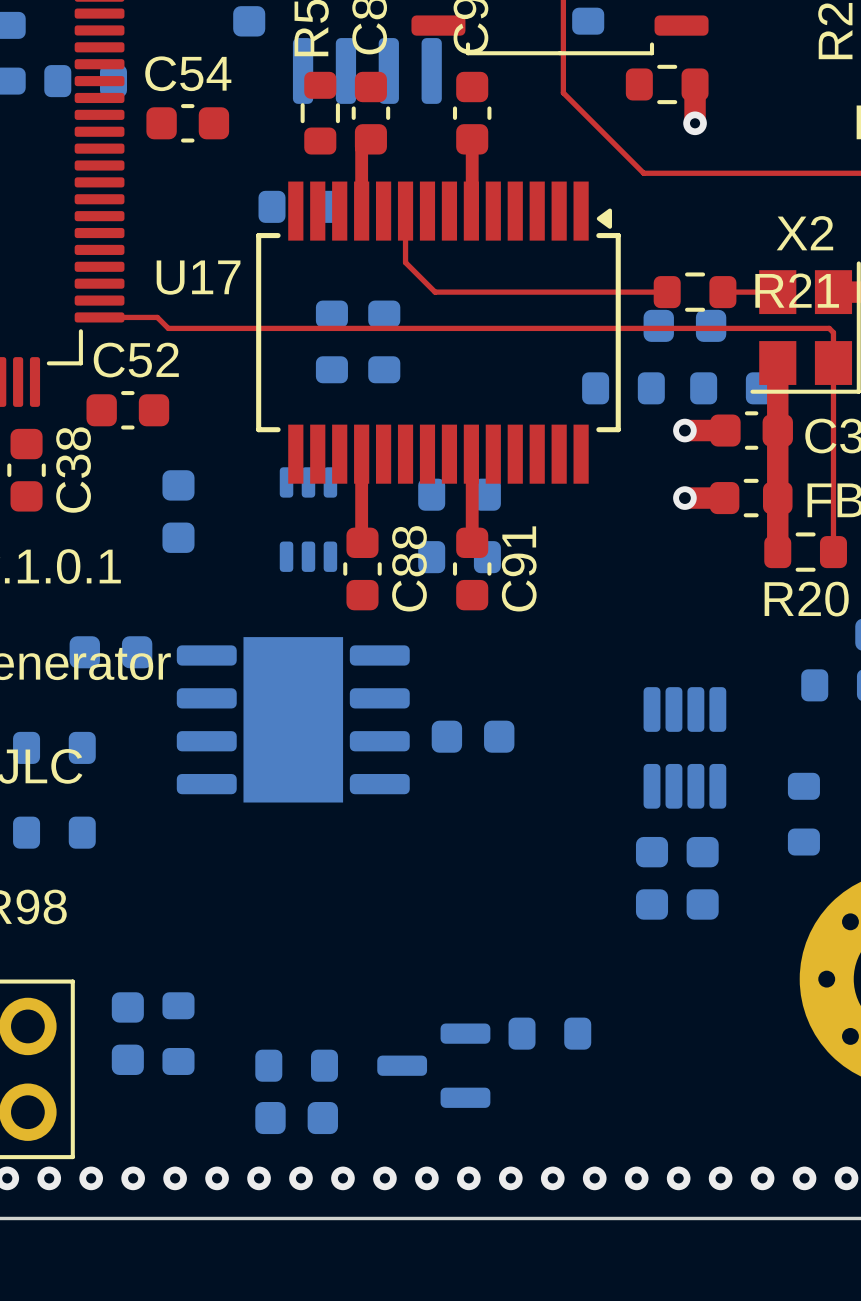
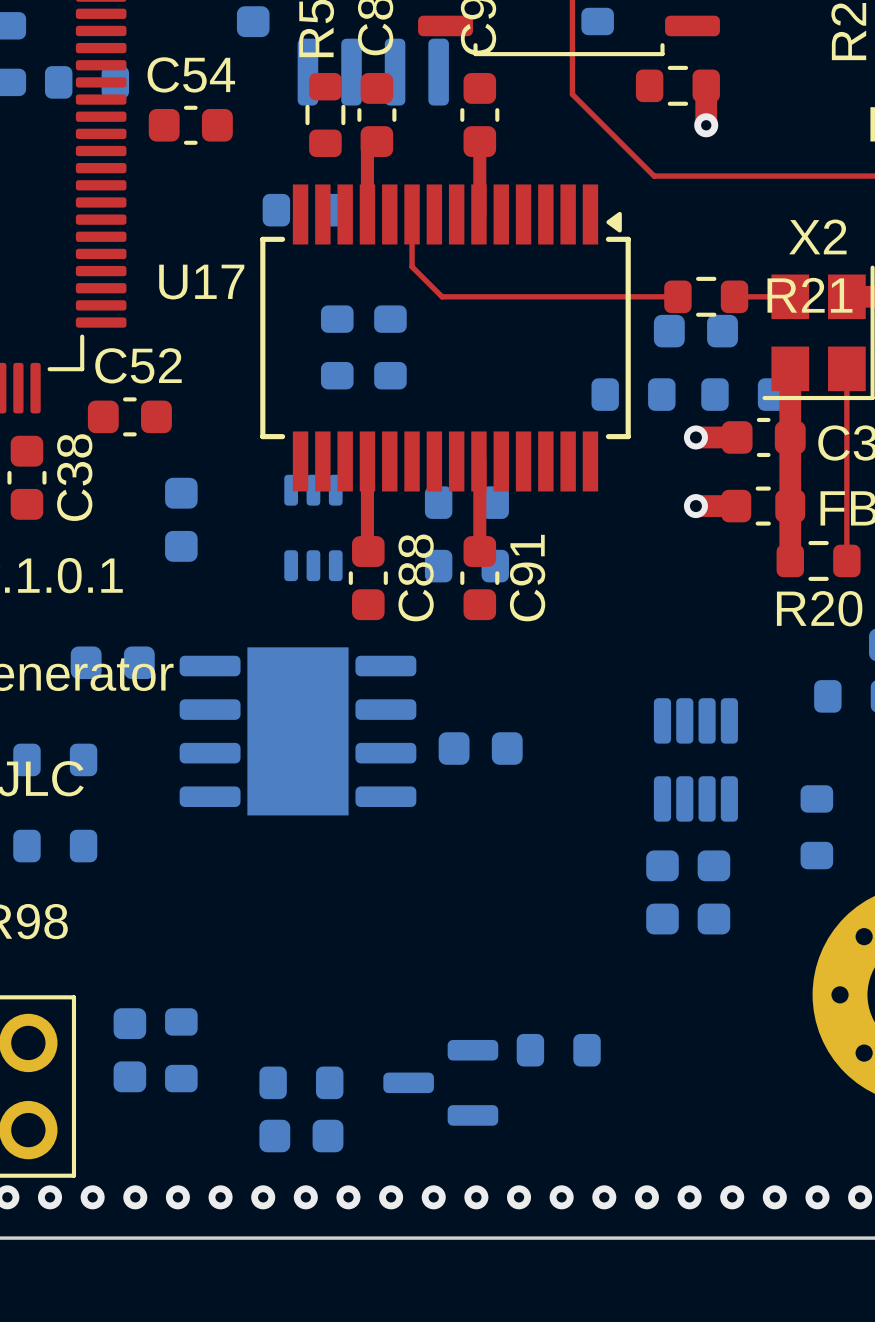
top track: (99, 317) (157, 317) (168, 328) (829, 328) (833, 332) (833, 363) -> none

